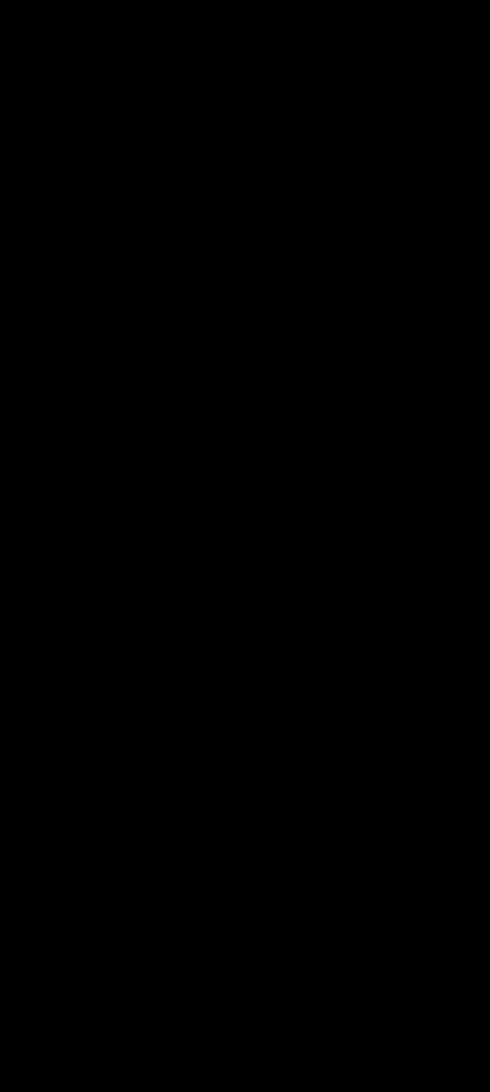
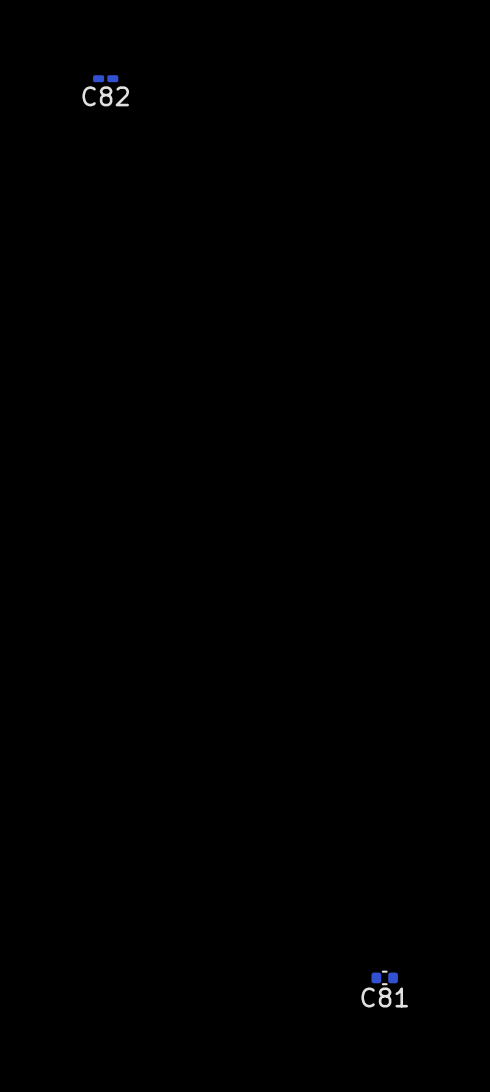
C82: none -> (105, 78)
C81: none -> (384, 977)

